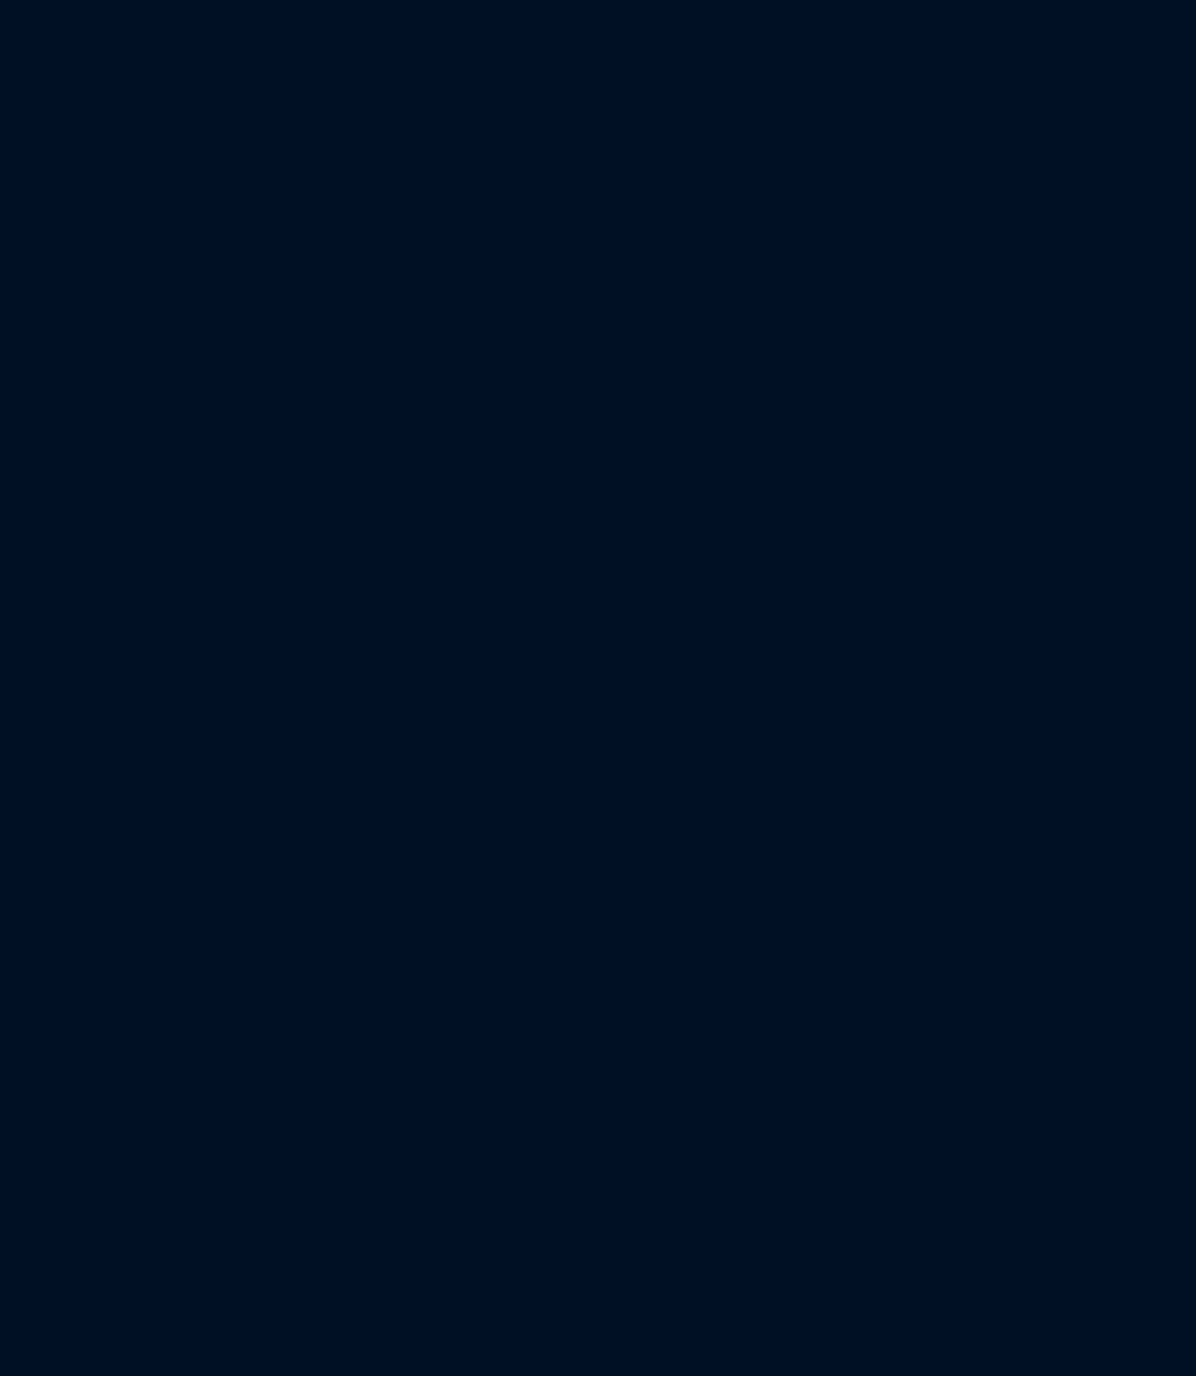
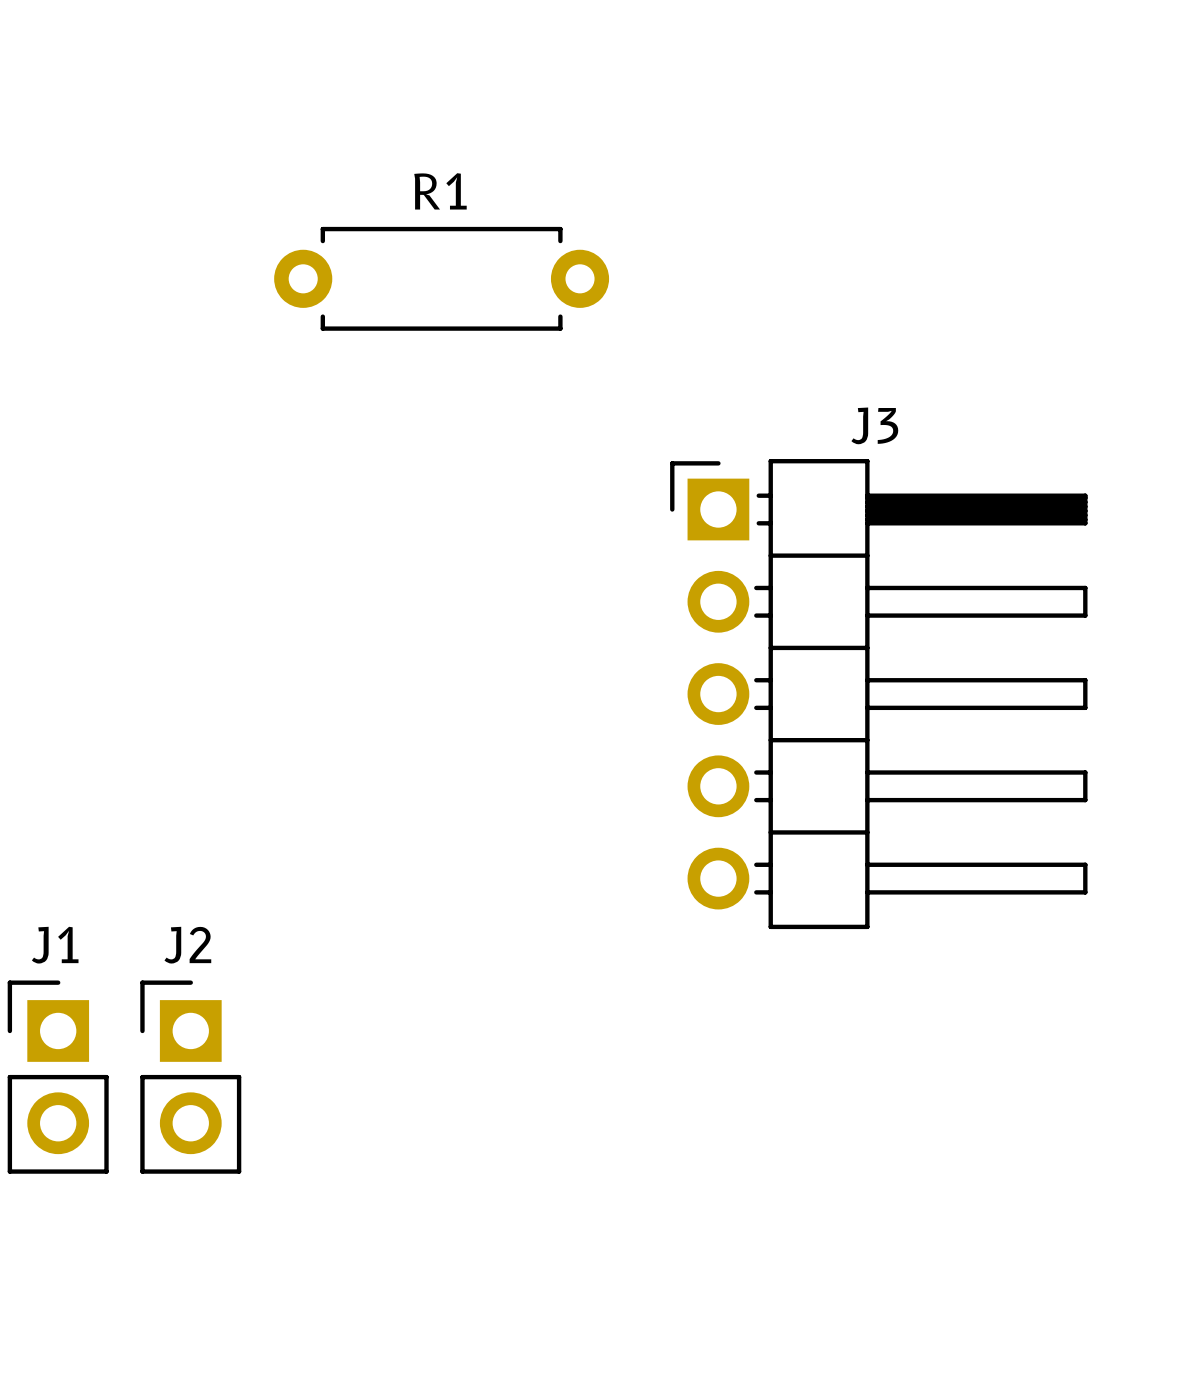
R1: none -> (441, 278)
J3: none -> (878, 694)
J1: none -> (58, 1077)
J2: none -> (190, 1077)

